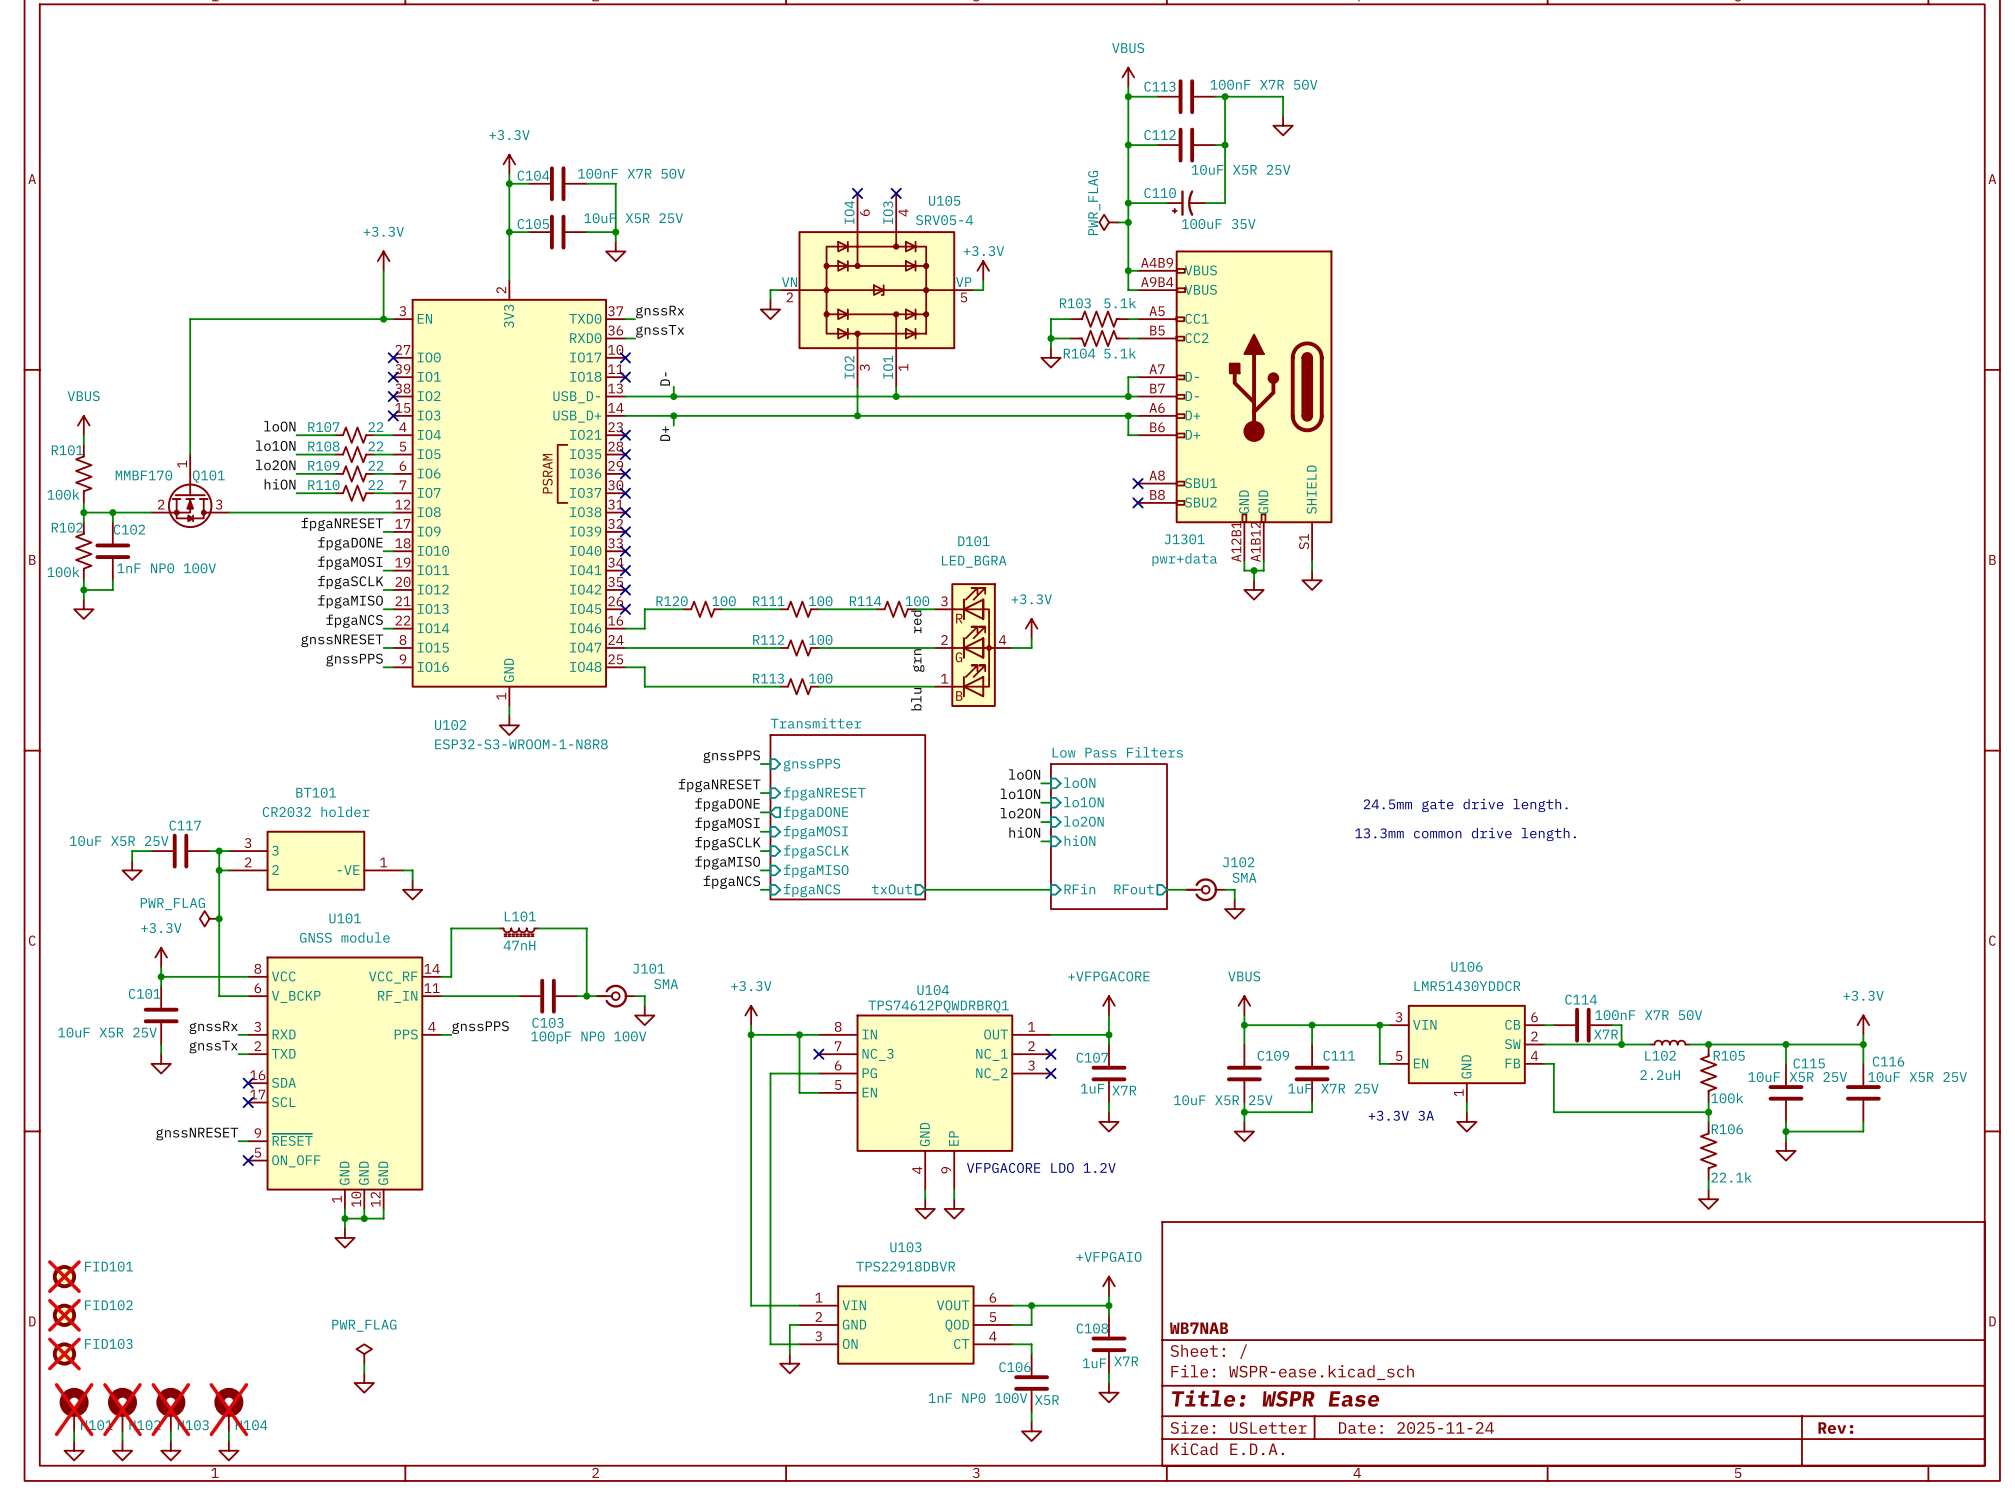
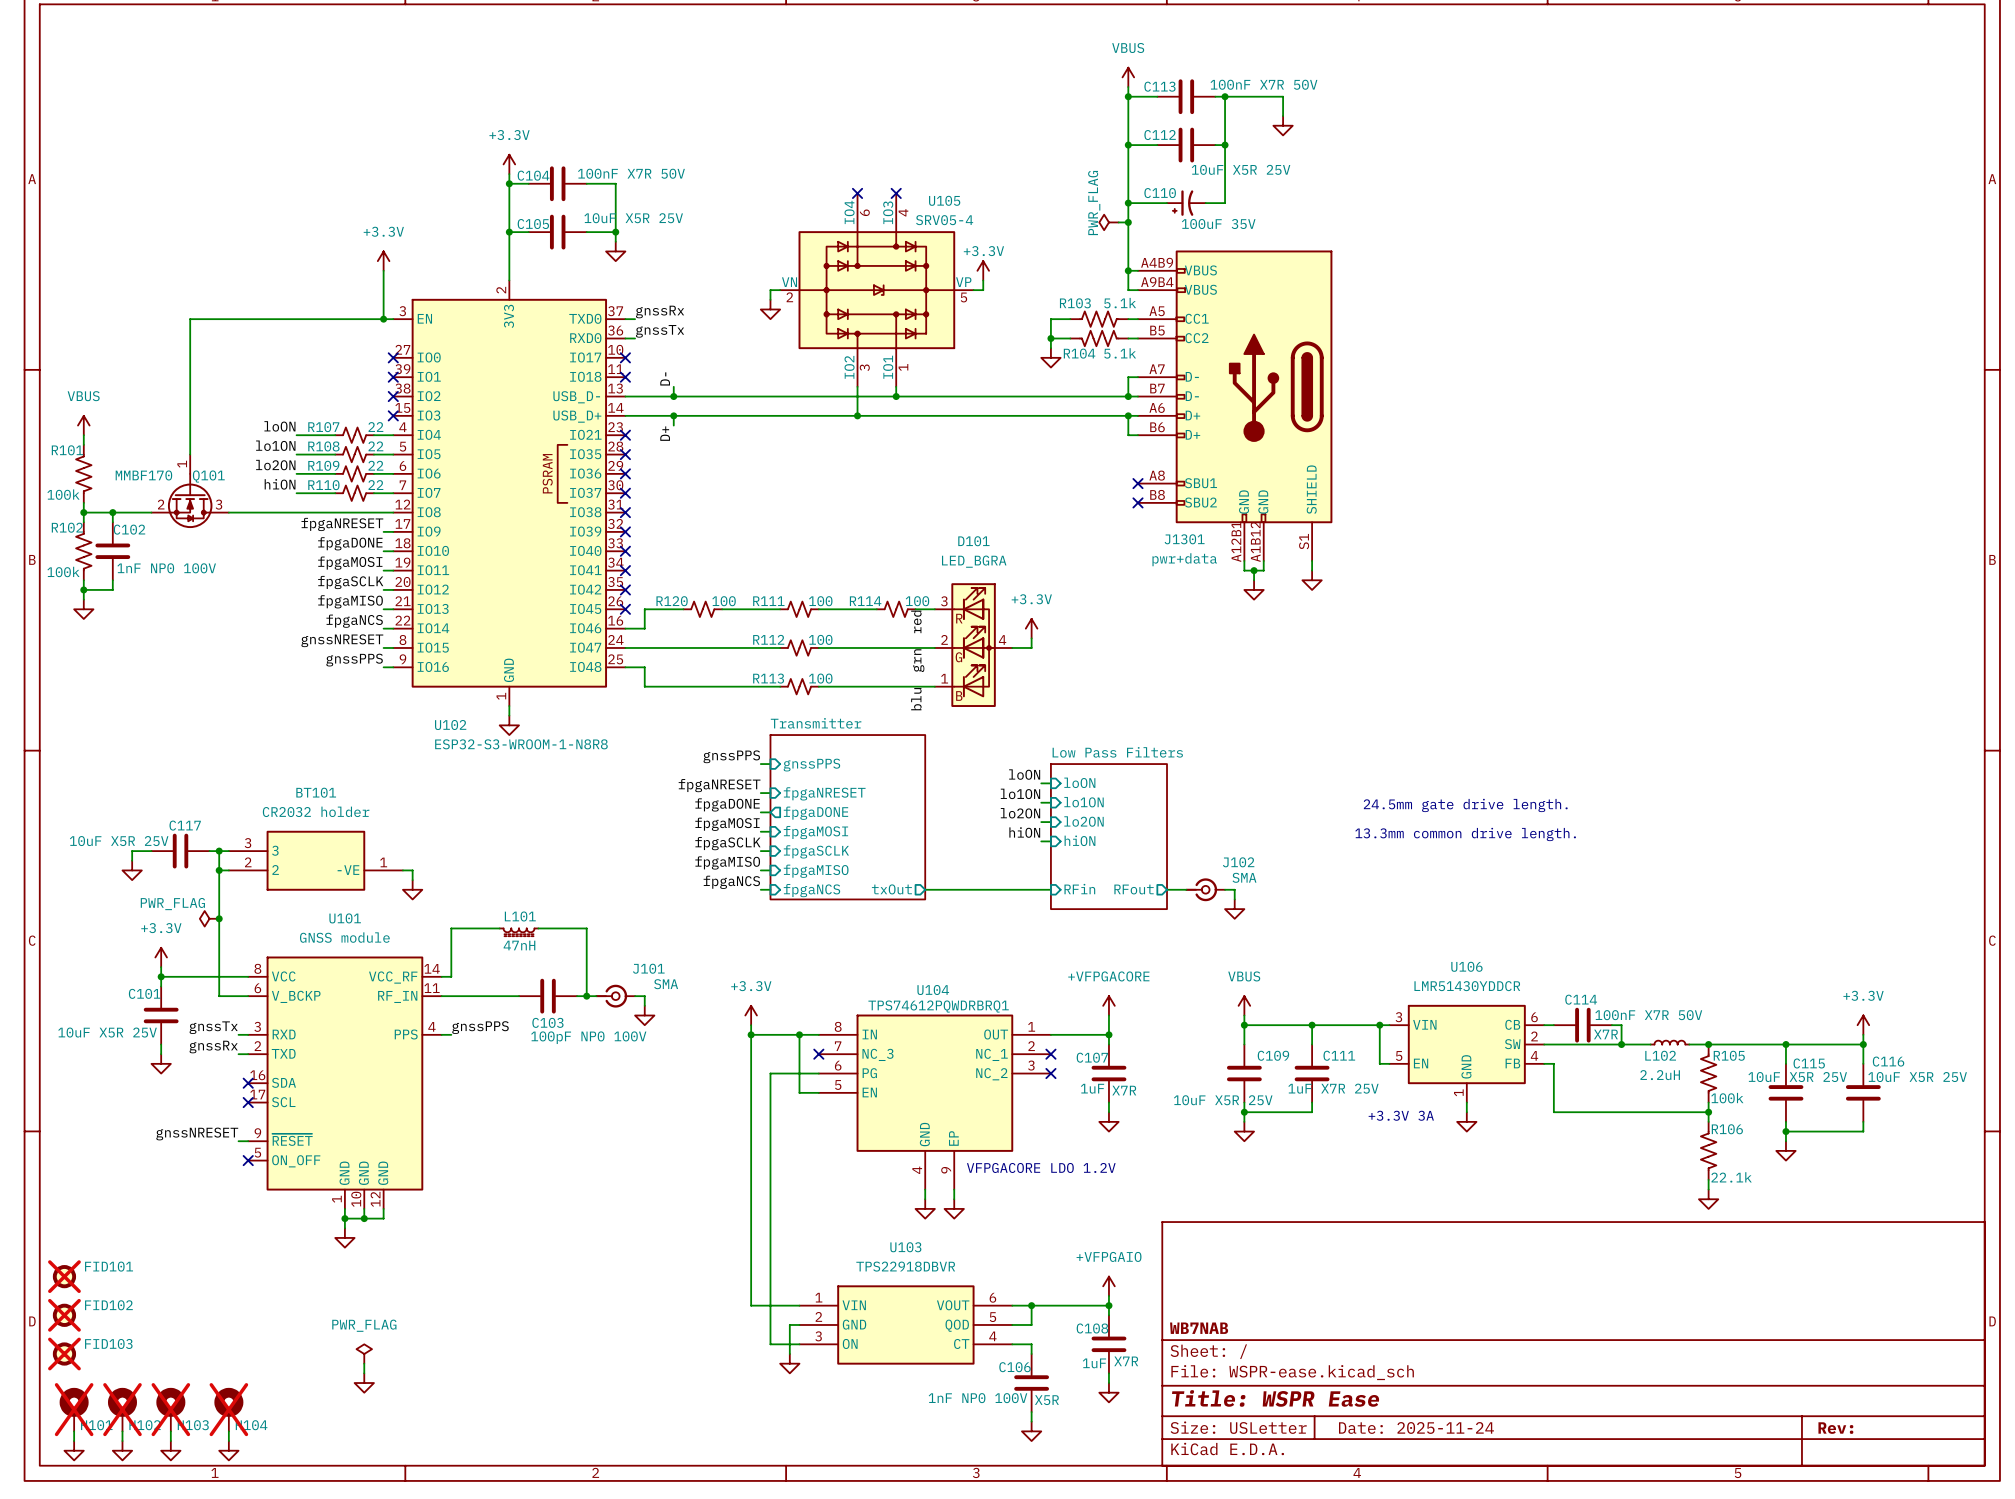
label: gnssRx (213, 1027) -> gnssTx (213, 1027)
label: gnssTx (213, 1047) -> gnssRx (213, 1047)

